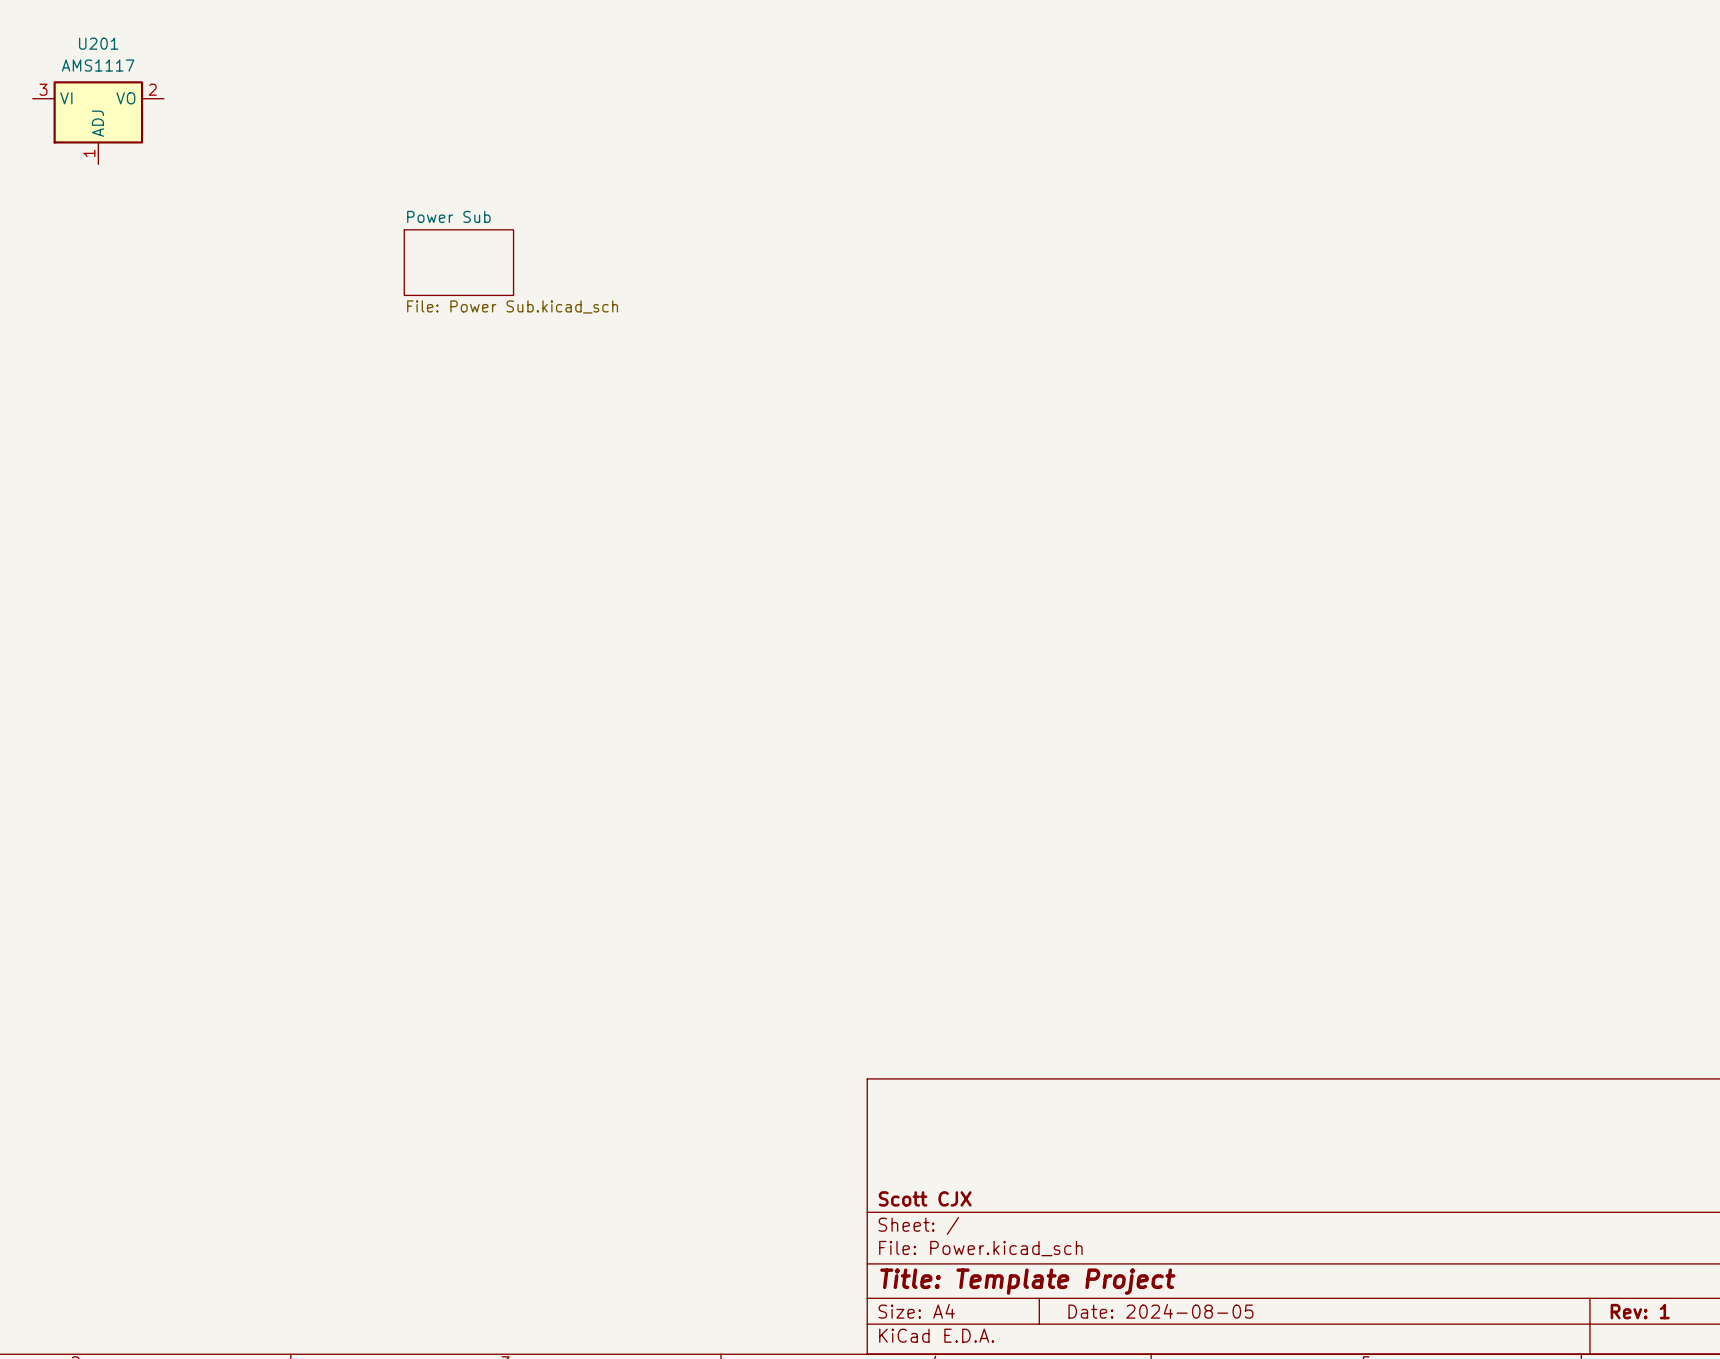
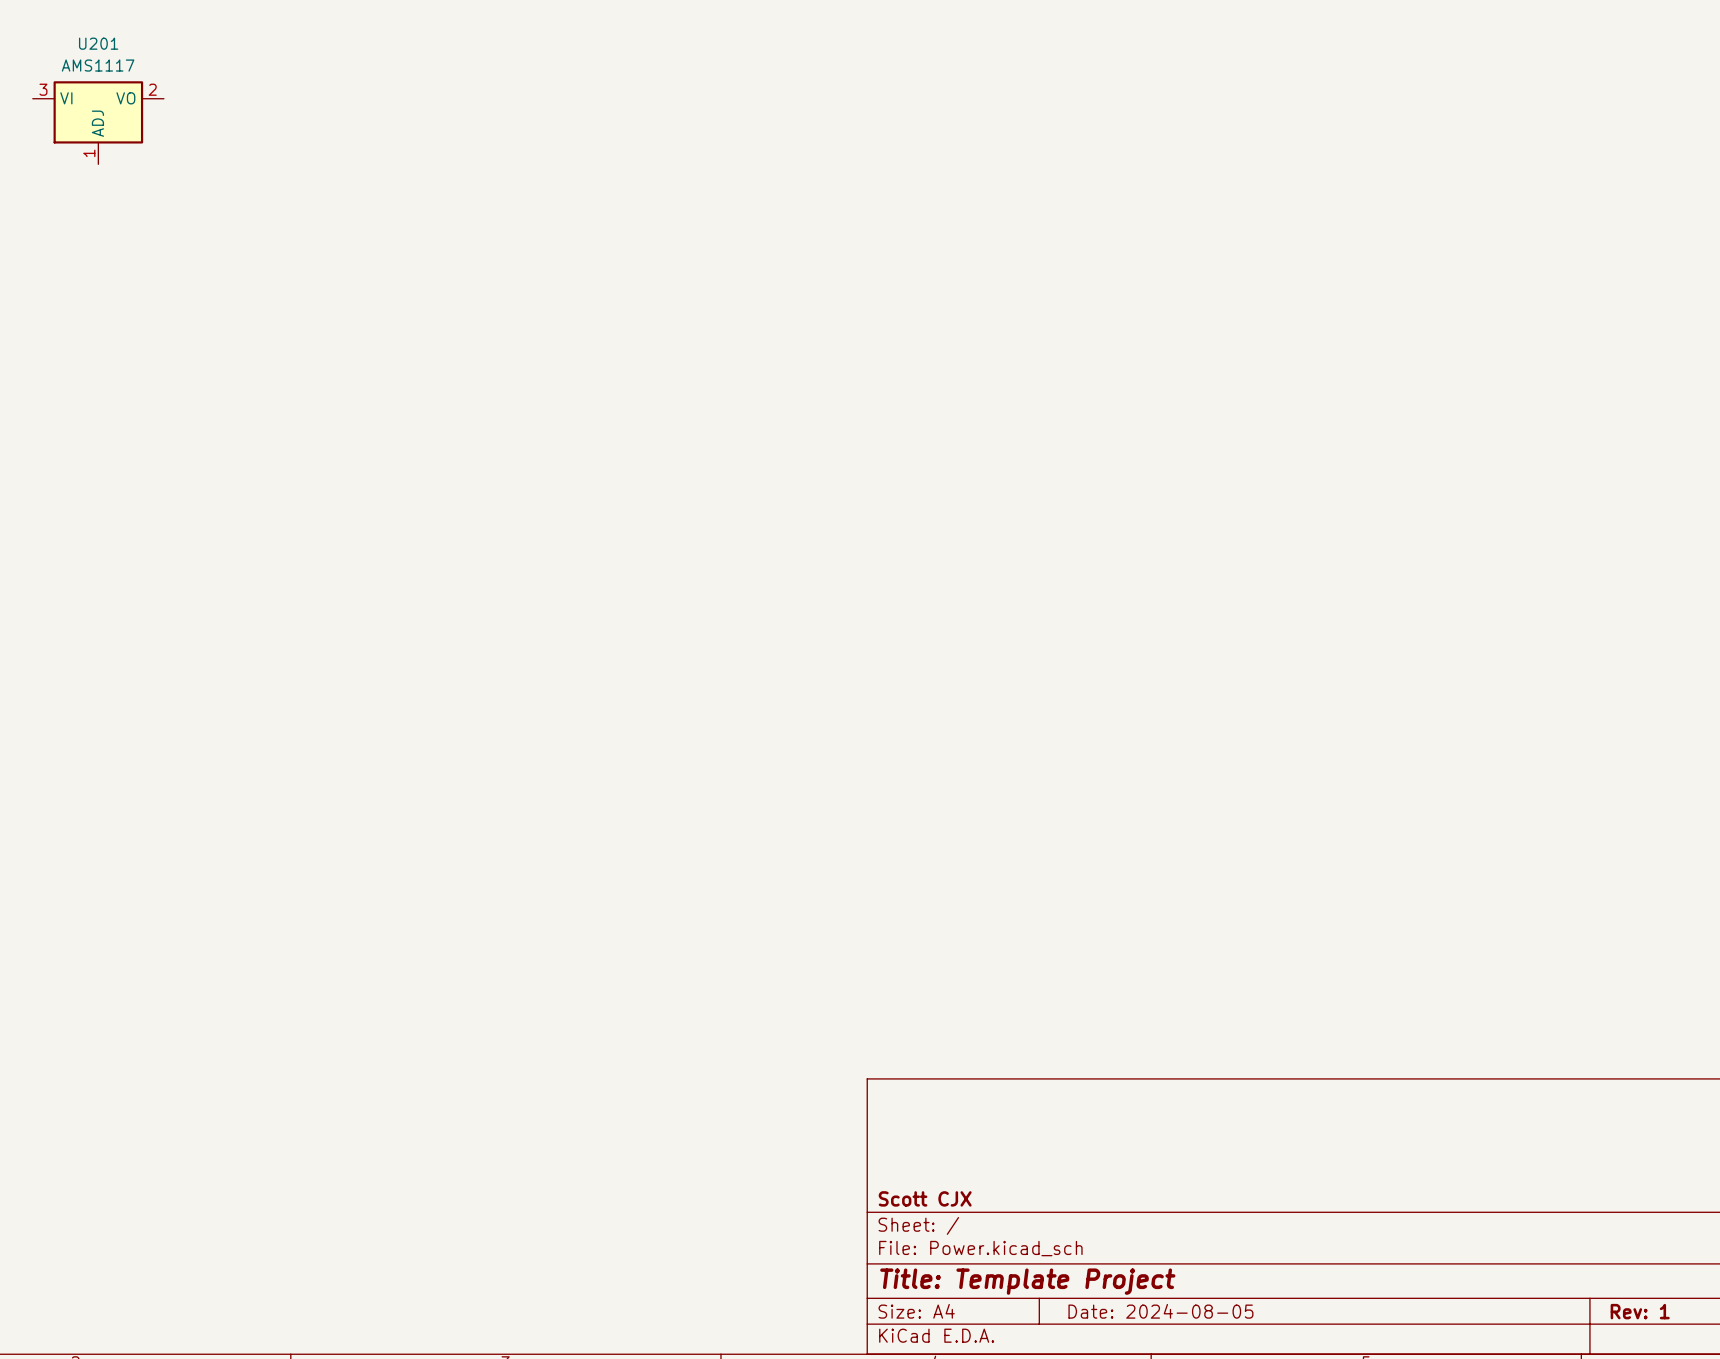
sheet Power Sub: File: Power Sub.kicad_sch (458, 262) -> none

